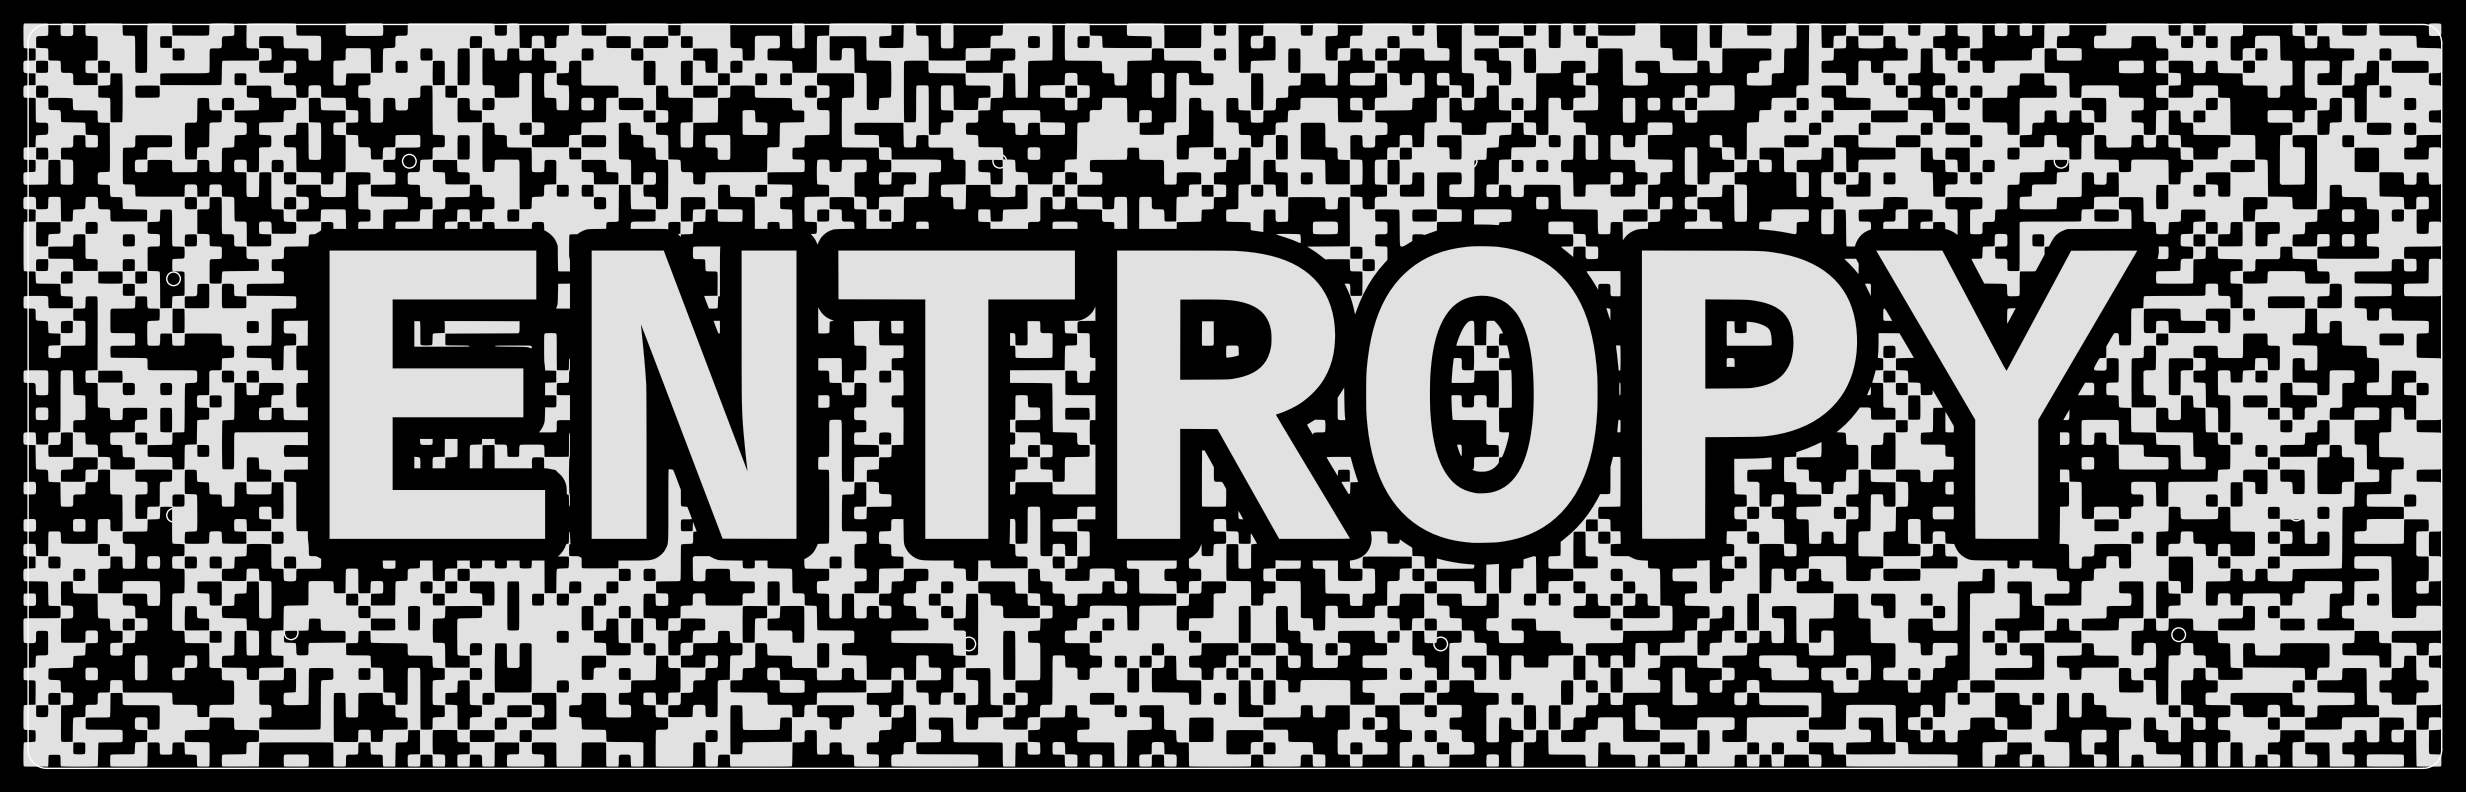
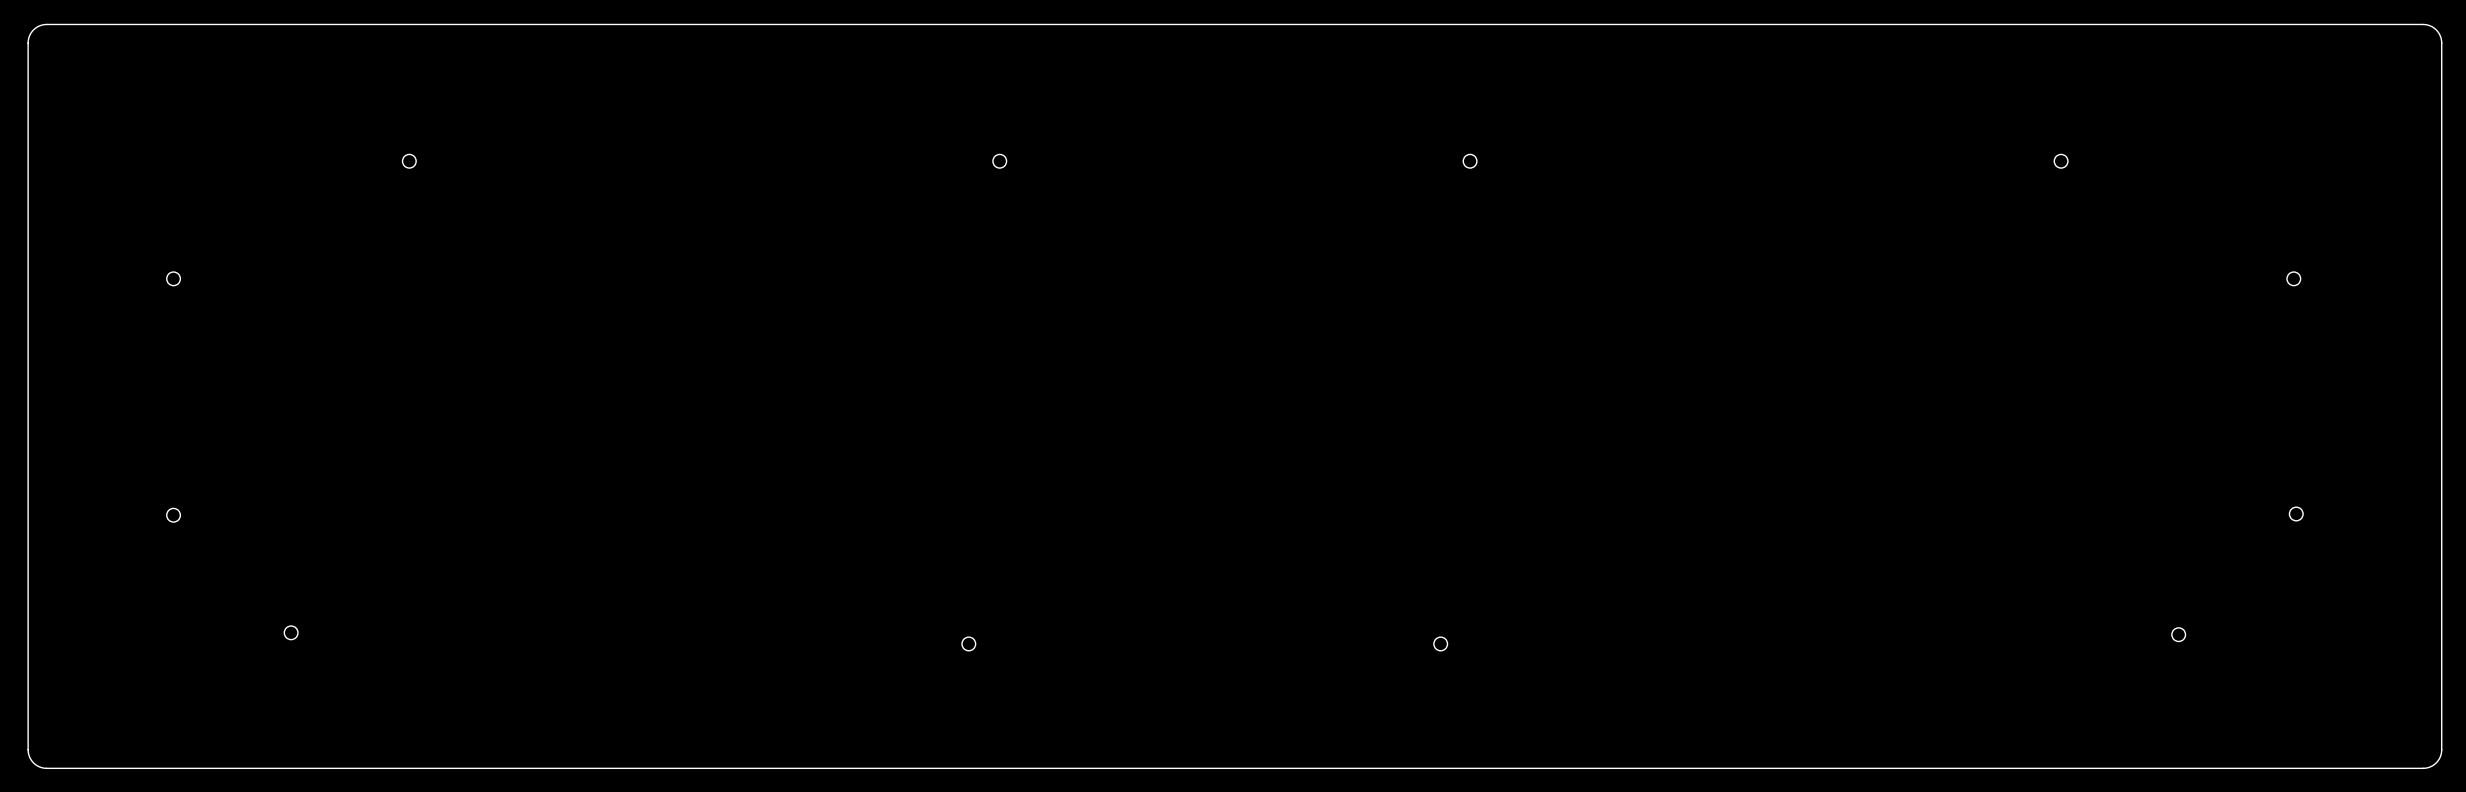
drawing: [23, 23, 2442, 767] -> none

